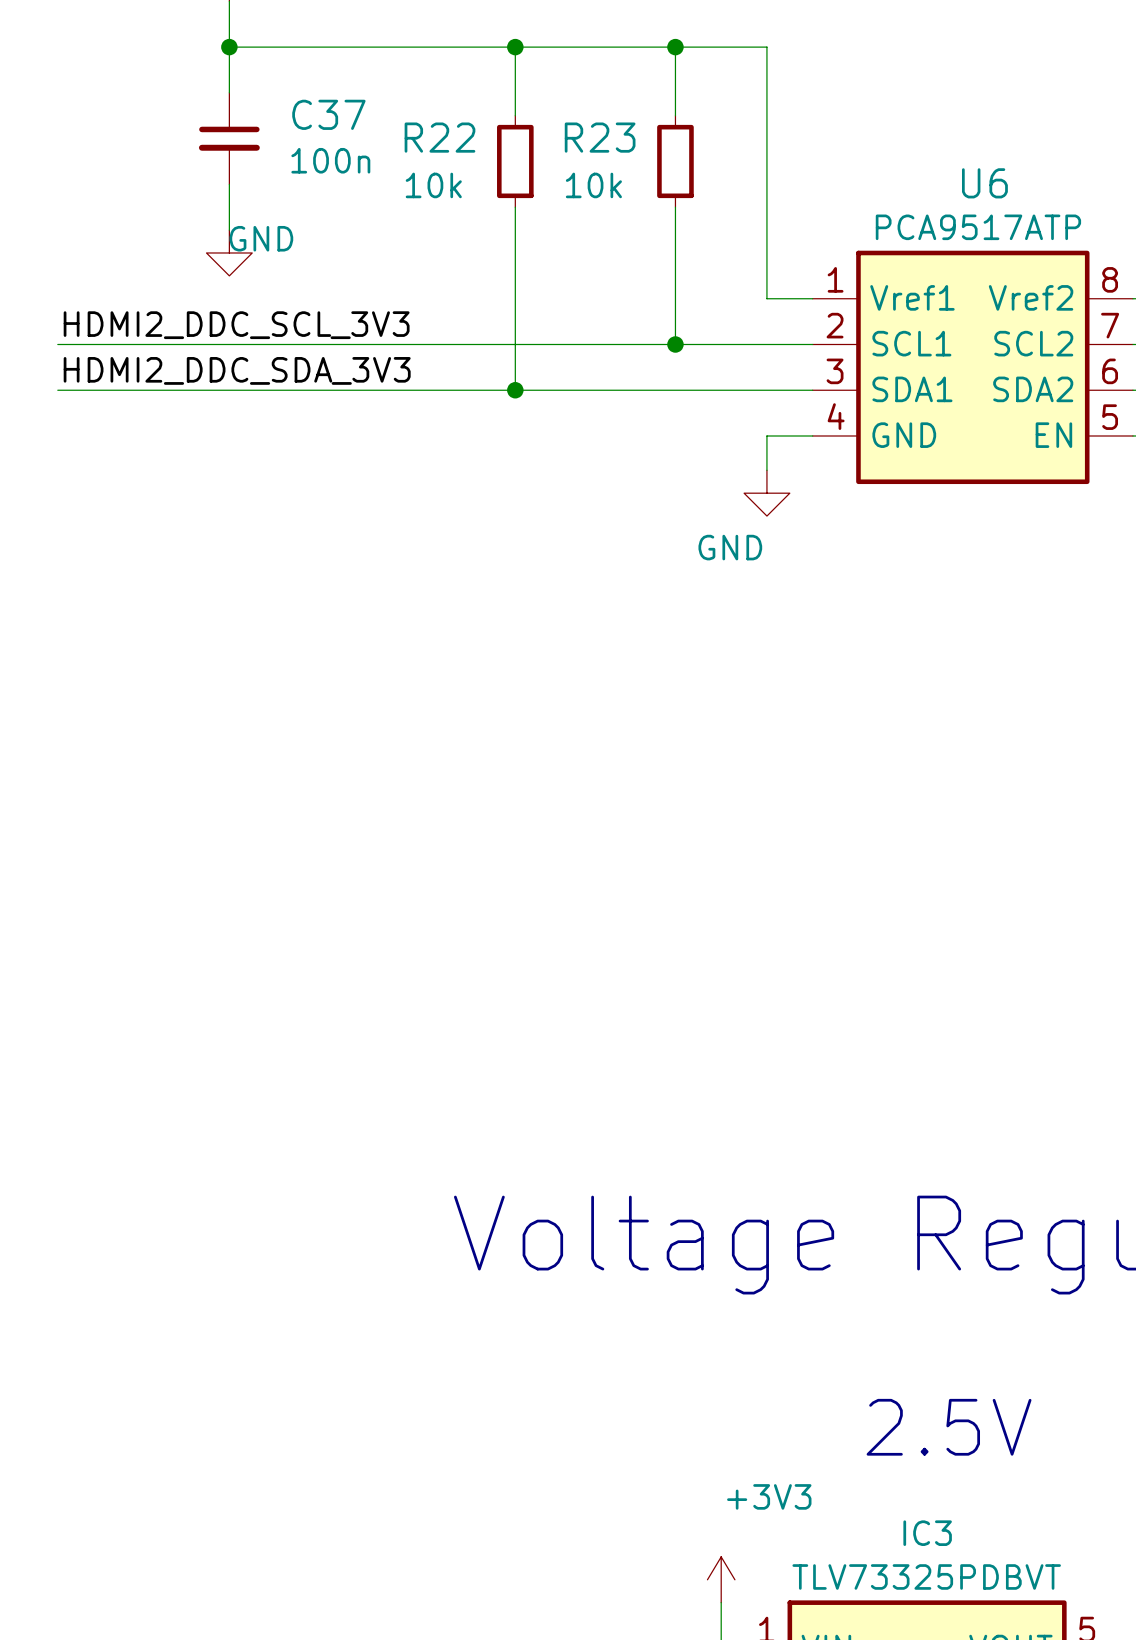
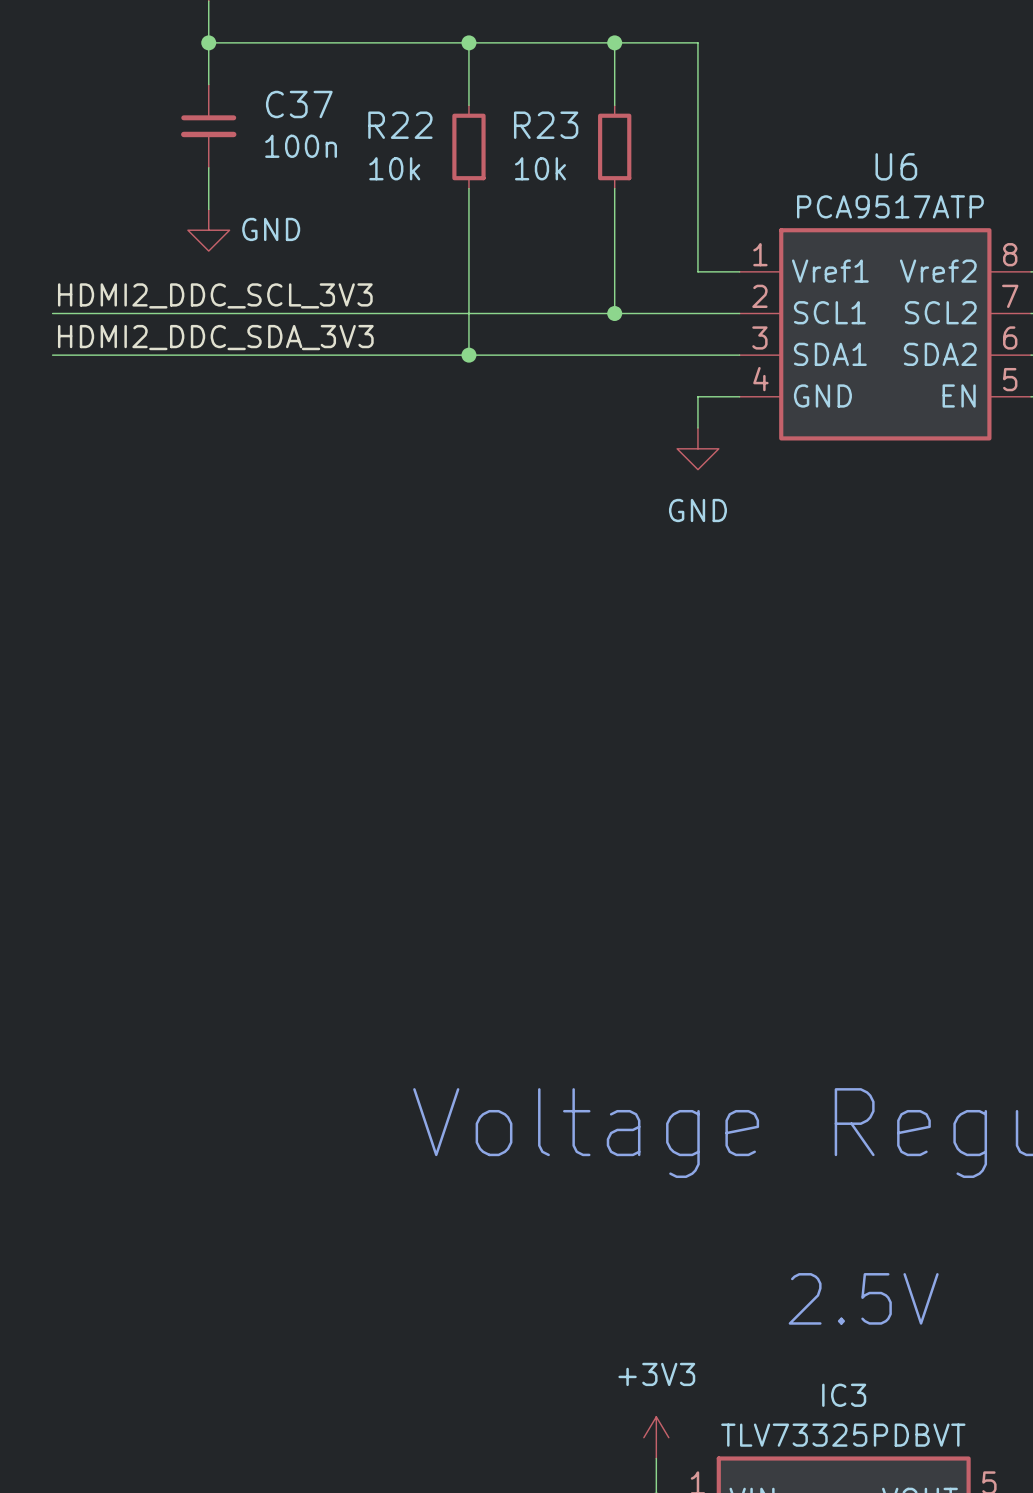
power symbol text position: GND (261, 238) -> GND (271, 229)
power symbol text position: GND (730, 547) -> GND (697, 510)
power symbol text position: +3V3 (769, 1496) -> +3V3 (656, 1374)

